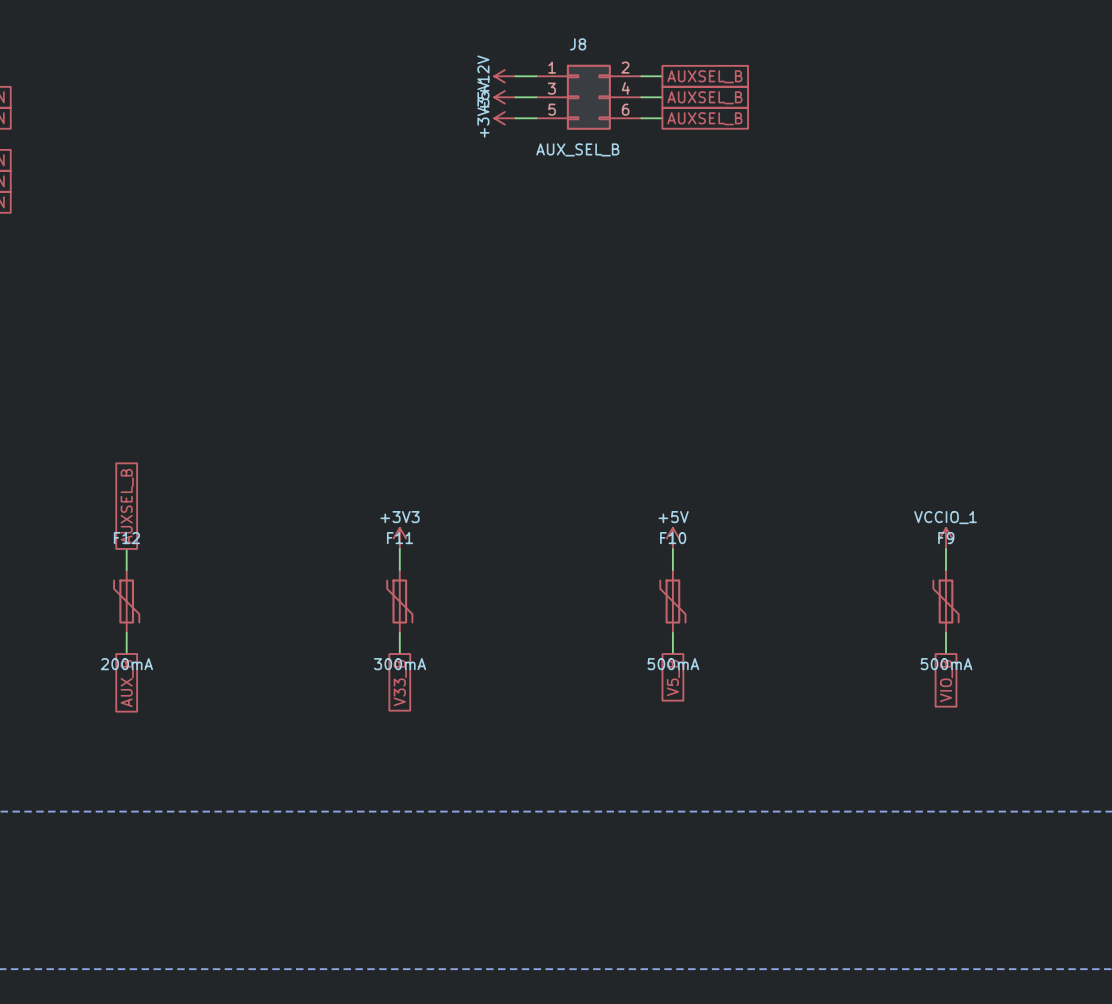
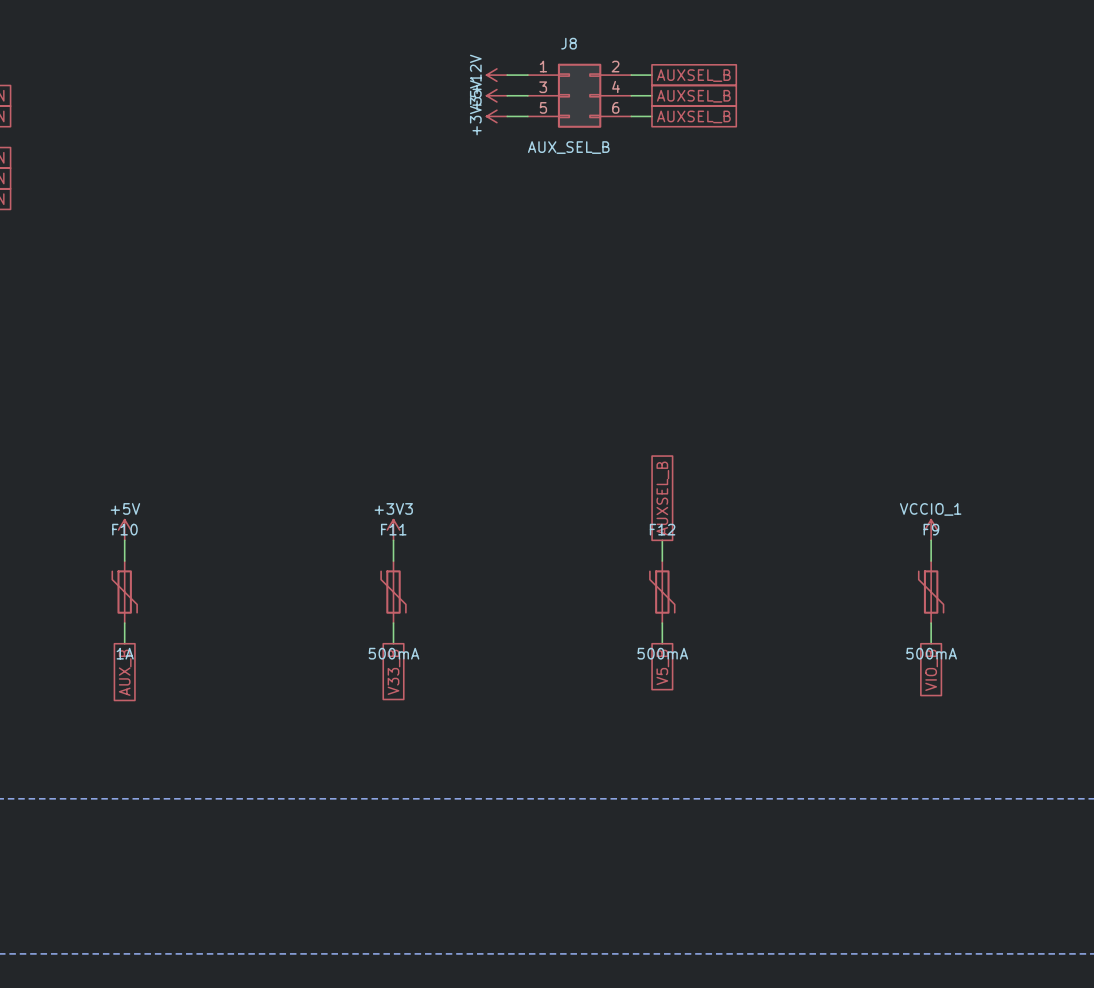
global label: AUXSEL_B (127, 506) -> none
global label: none -> AUXSEL_B (662, 498)
F12 name: F12 (126, 538) -> F10 (124, 529)
power symbol: none -> +5V (124, 530)
power symbol: +5V (672, 538) -> none
F10 name: F10 (673, 538) -> F12 (662, 529)
F12 value: 200mA (126, 664) -> 1A (125, 653)
F11 value: 300mA (400, 664) -> 500mA (394, 653)

